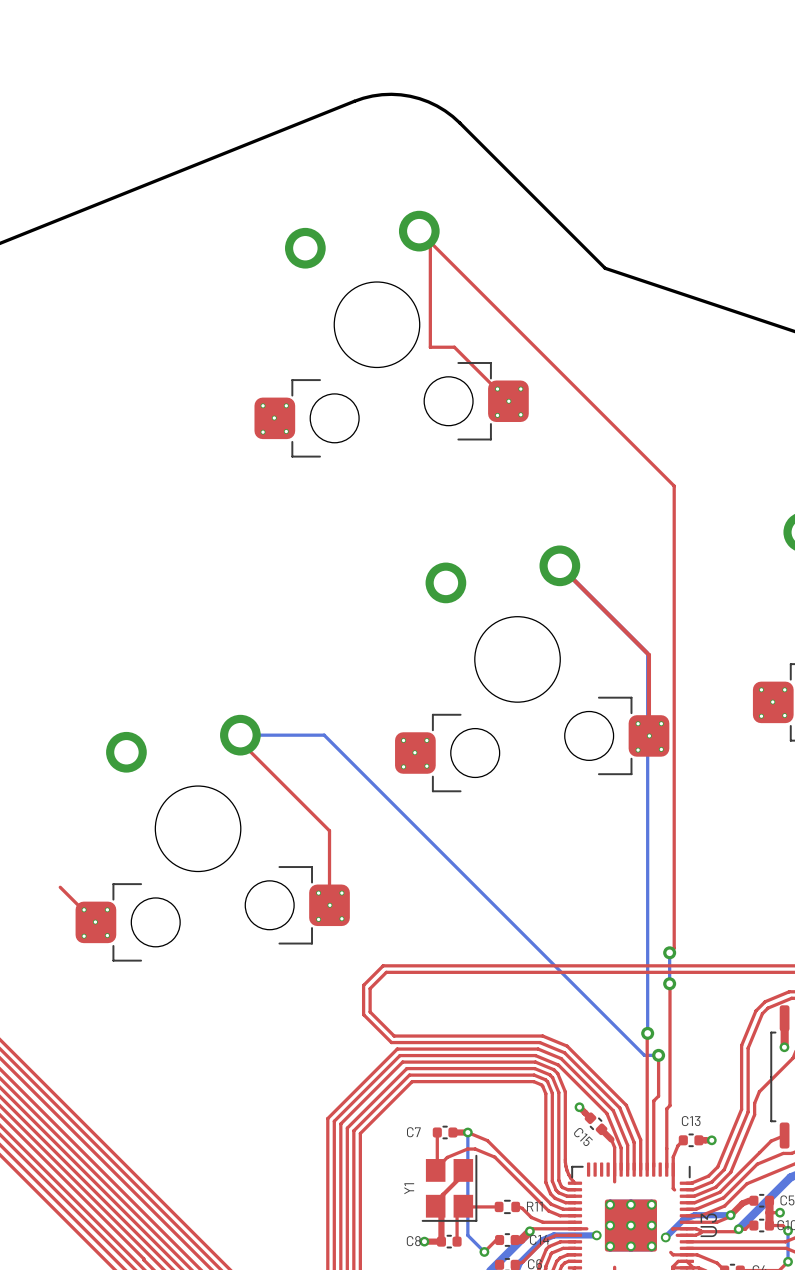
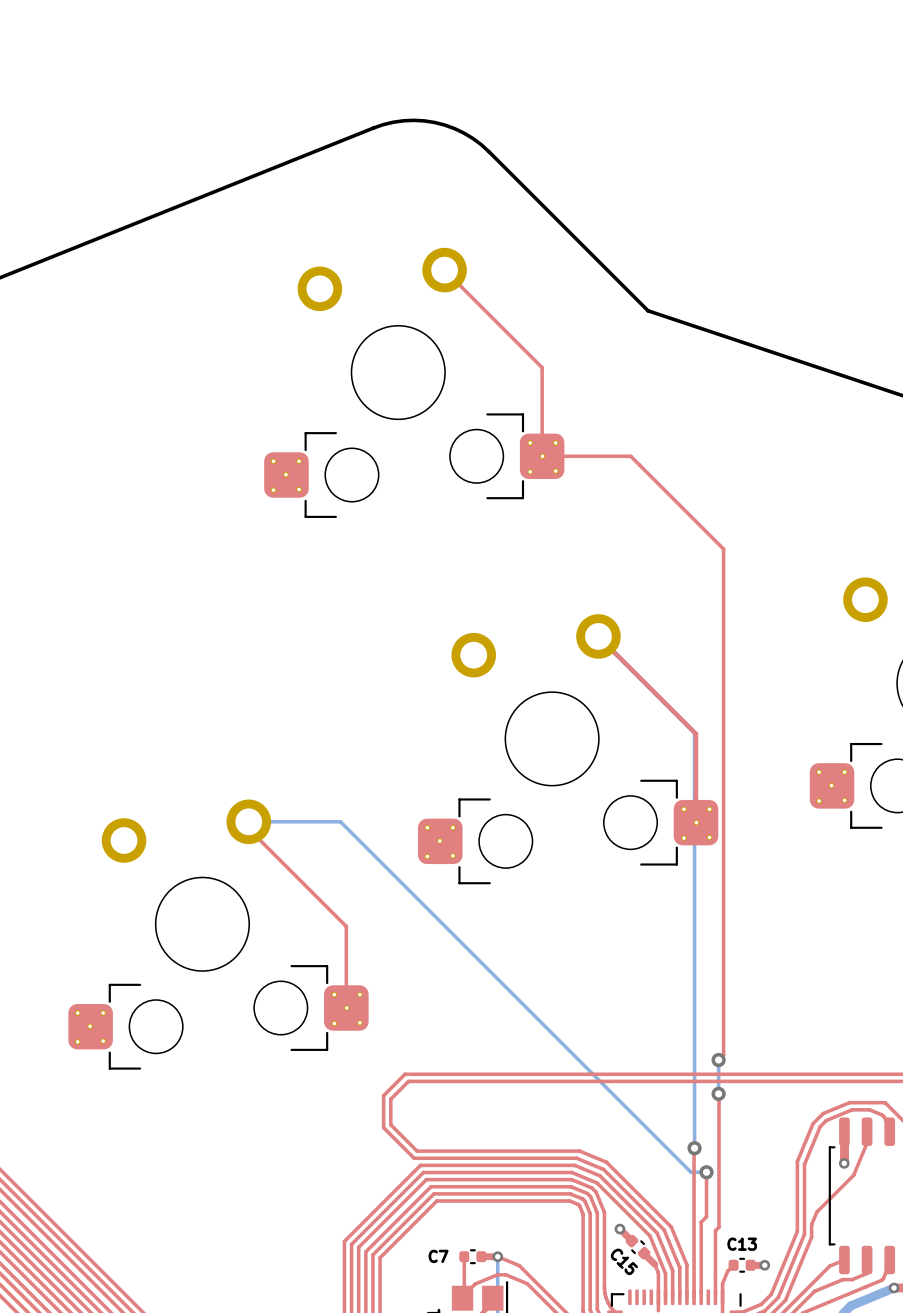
top track: (430, 242) (430, 347) (454, 347) (508, 401) -> none
top track: (508, 320) (589, 401) -> (542, 367) (542, 456) (630, 456)
top track: (60, 887) (83, 910) -> none

